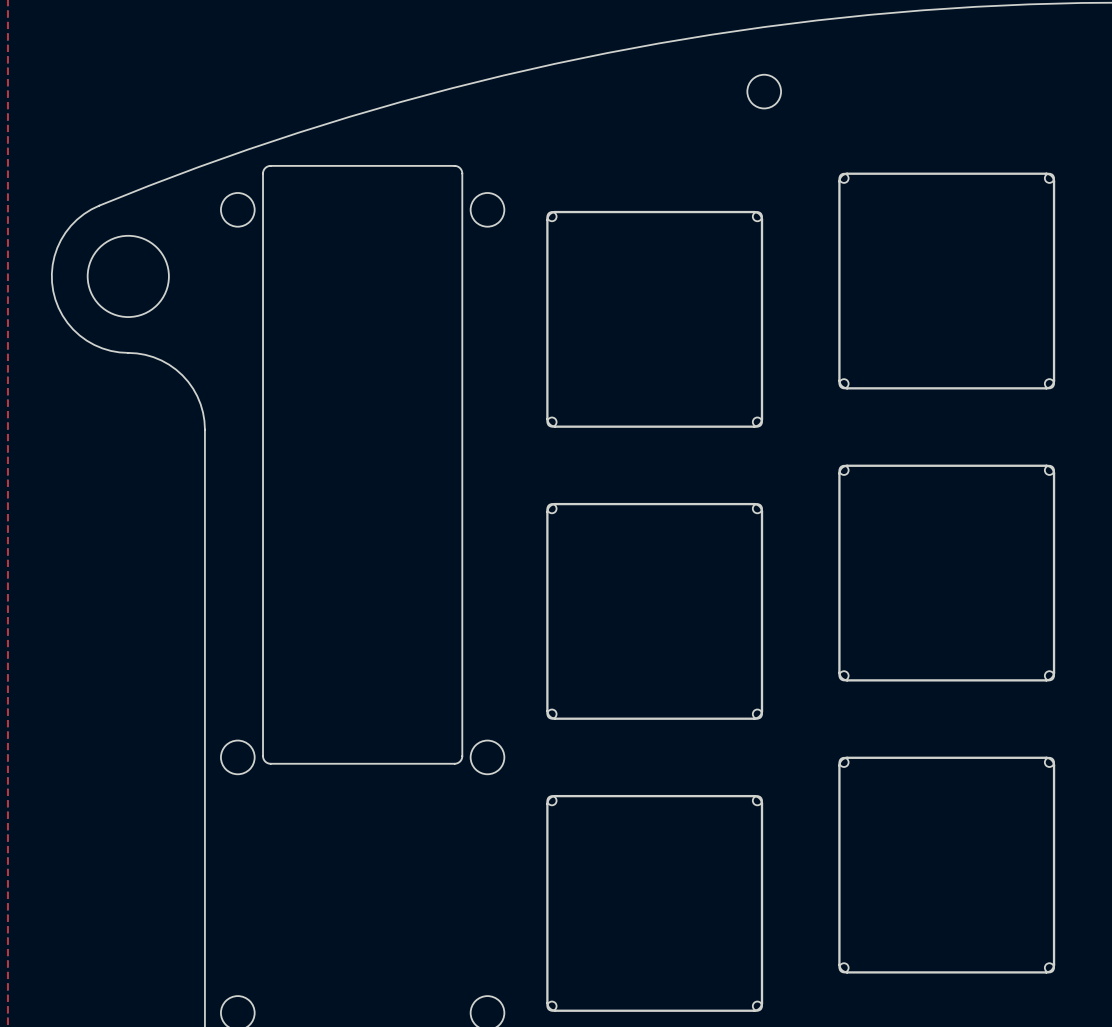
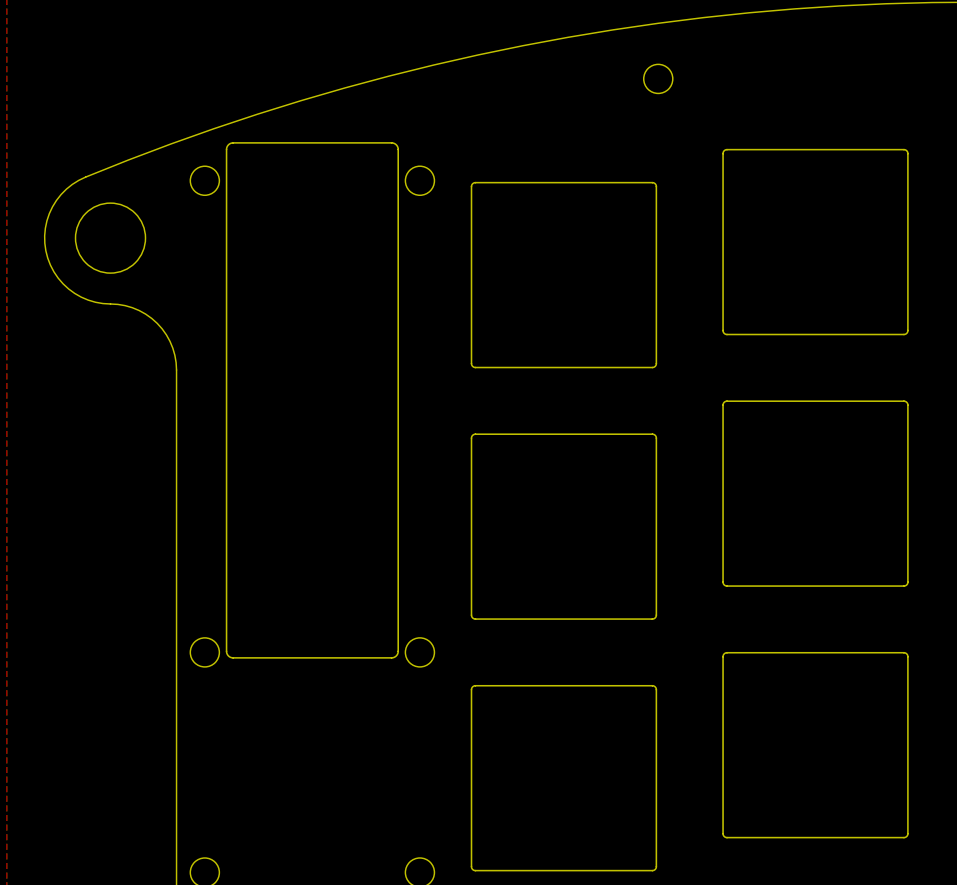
drawing: none -> [722, 148, 909, 336]
drawing: none -> [470, 181, 658, 369]
part: (946, 281) -> none
part: (654, 319) -> none
drawing: none -> [722, 400, 909, 587]
drawing: none -> [470, 433, 658, 620]
part: (946, 573) -> none
part: (654, 611) -> none
drawing: none -> [722, 651, 909, 839]
drawing: none -> [470, 684, 658, 872]
part: (946, 865) -> none
part: (654, 903) -> none

